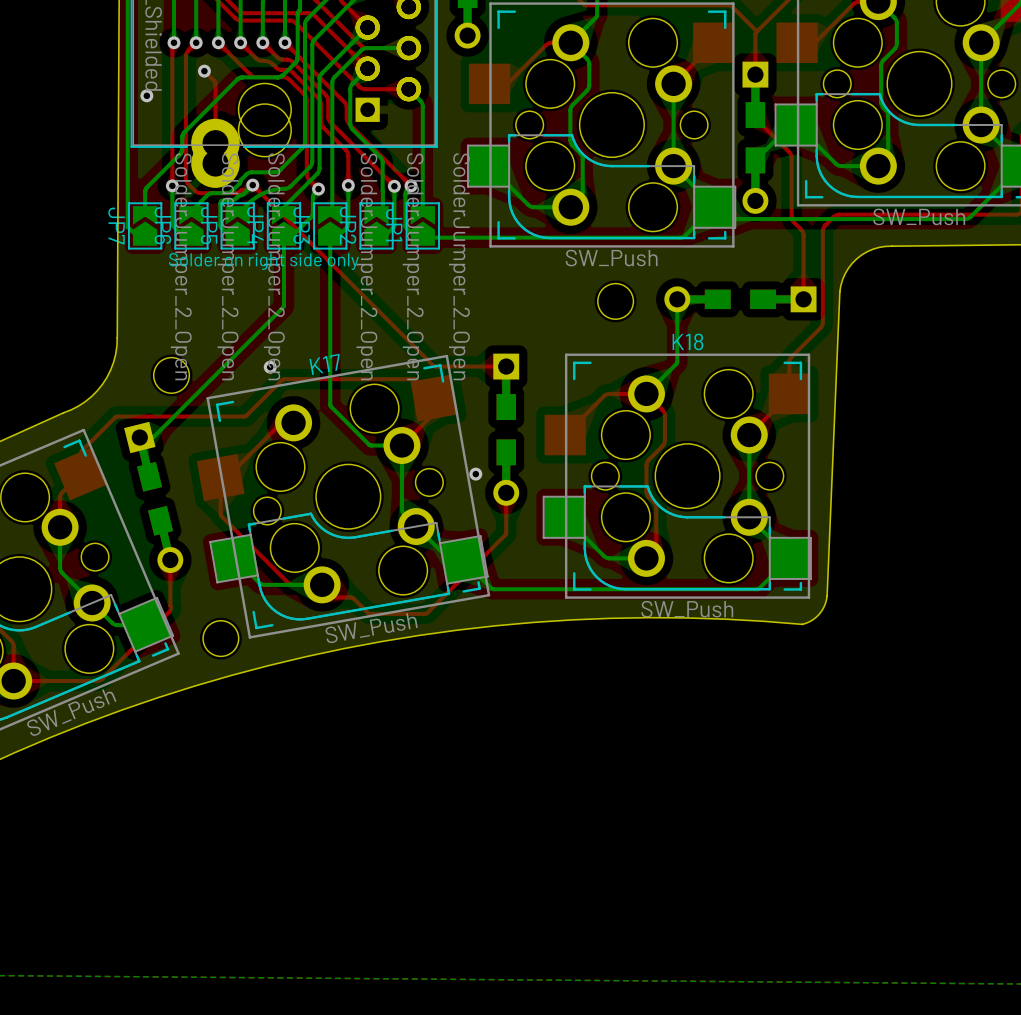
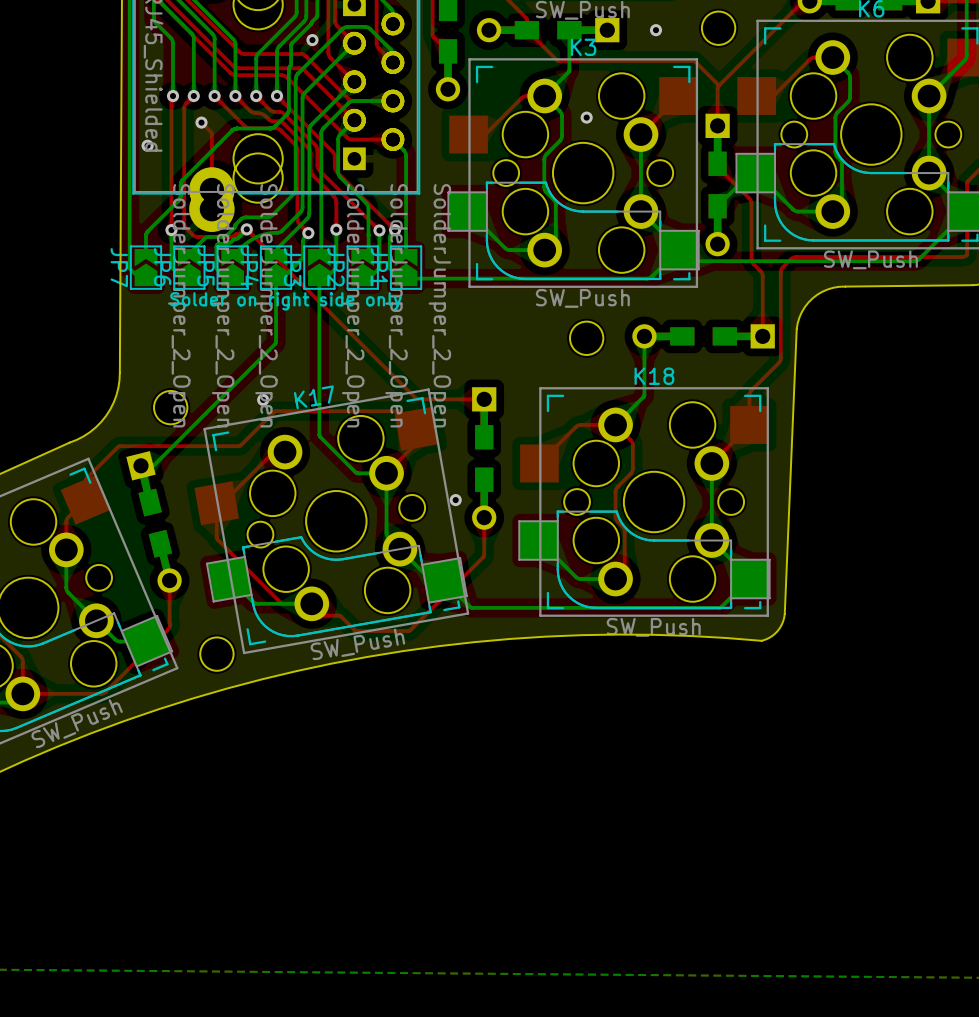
via: none -> (586, 117)

